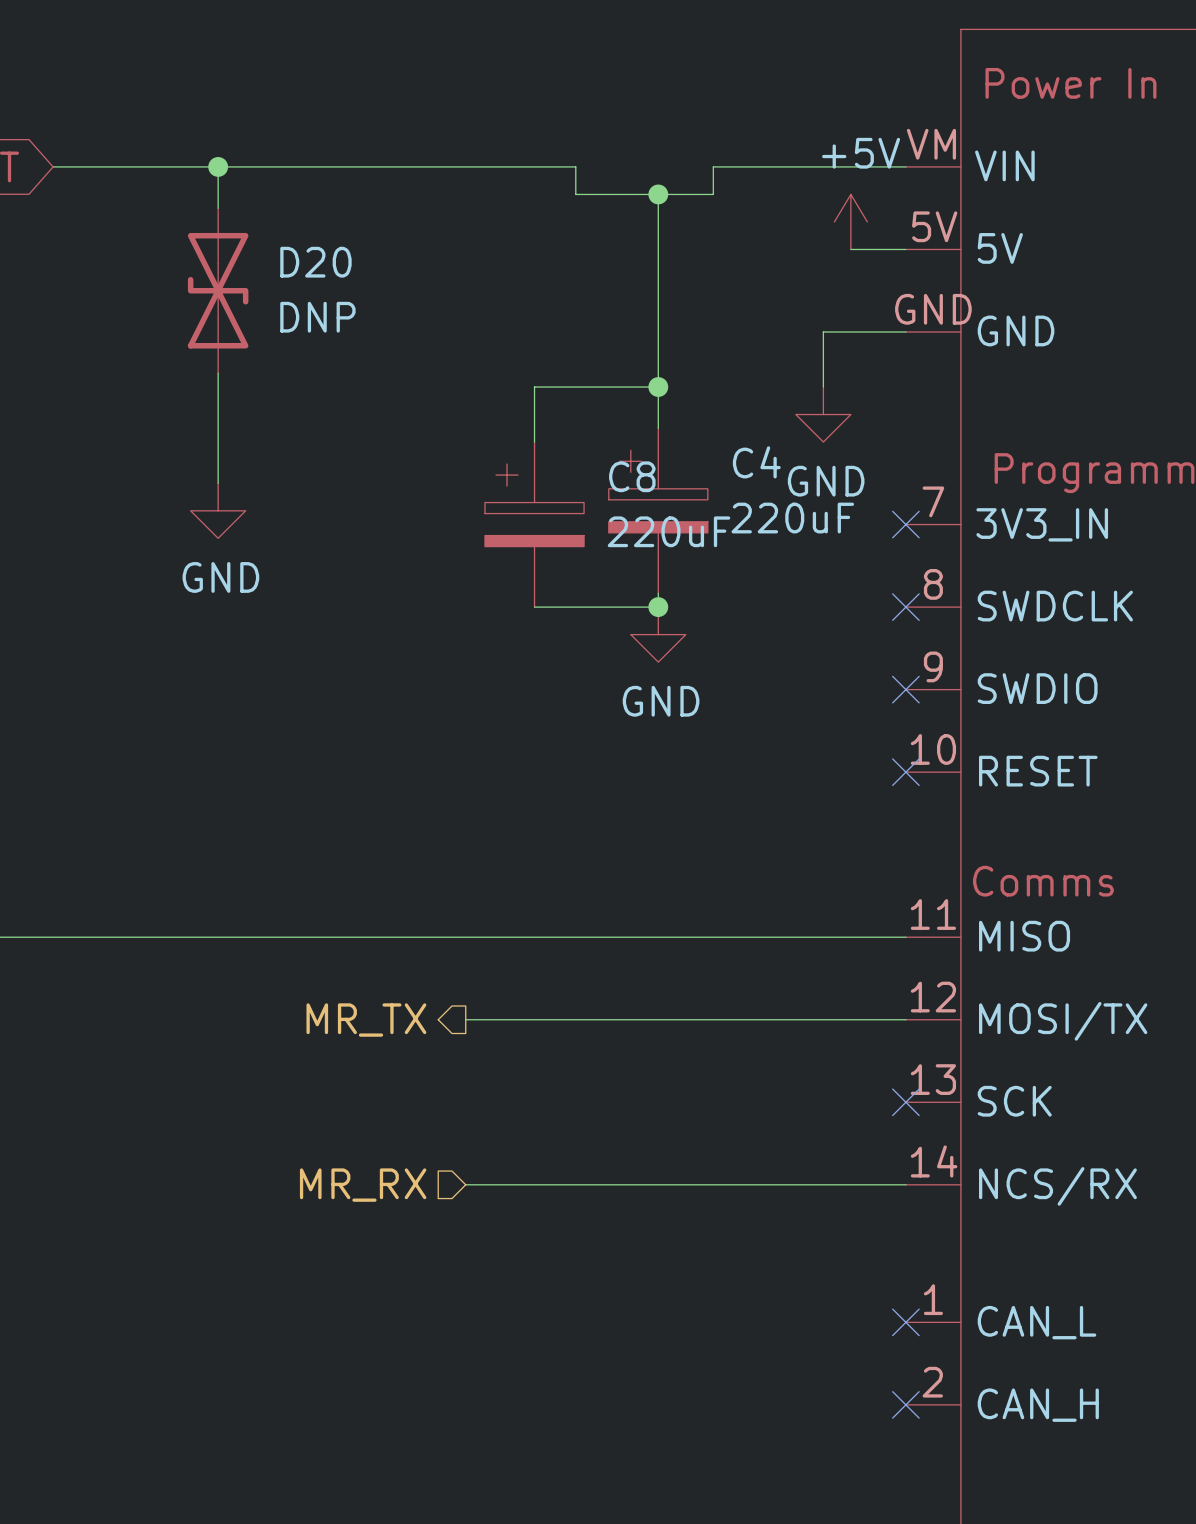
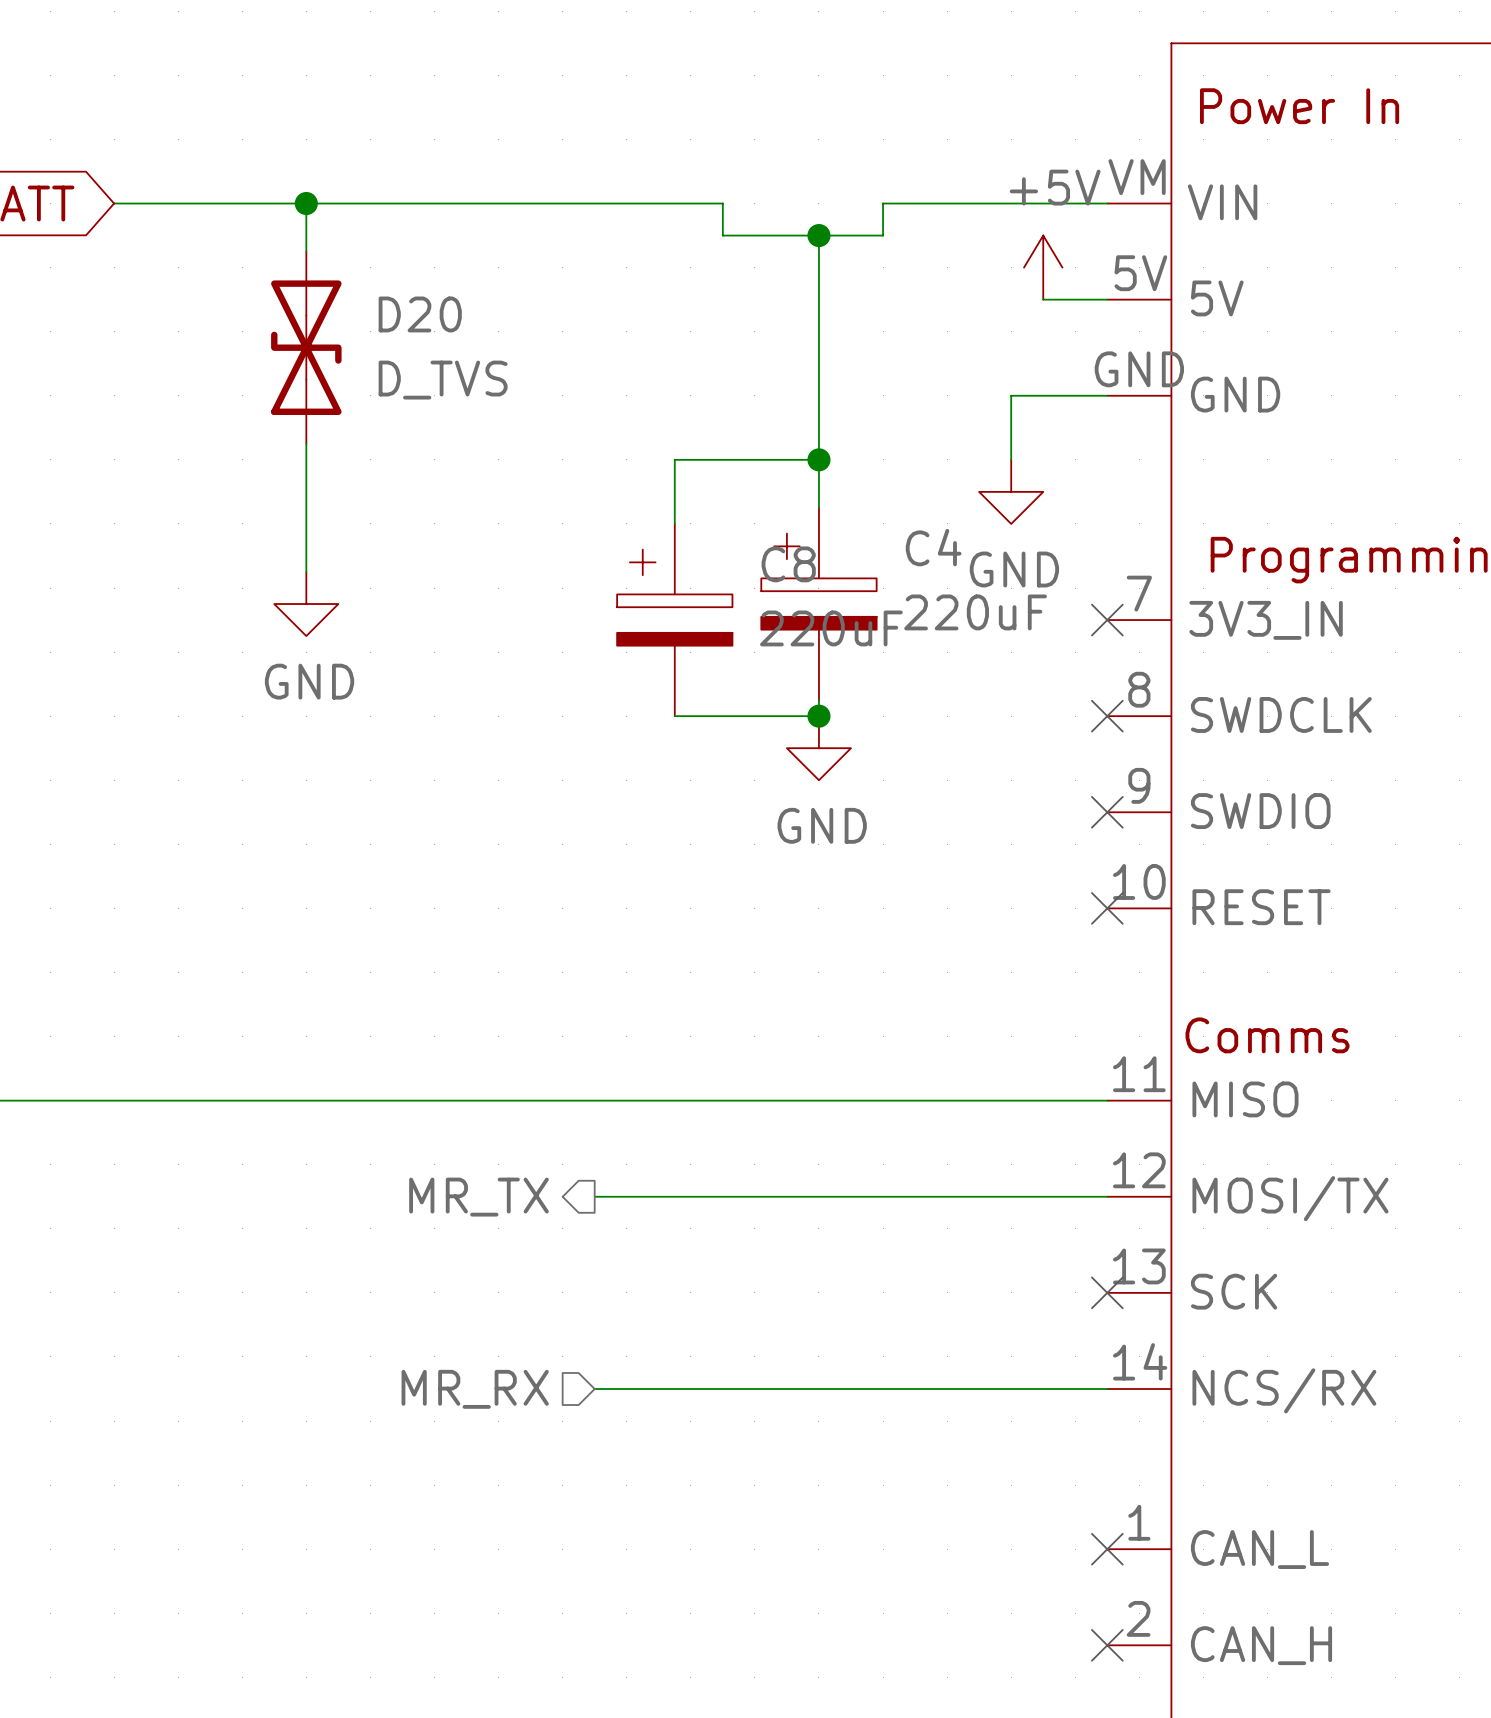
D20 value: DNP (317, 317) -> D_TVS (443, 380)

